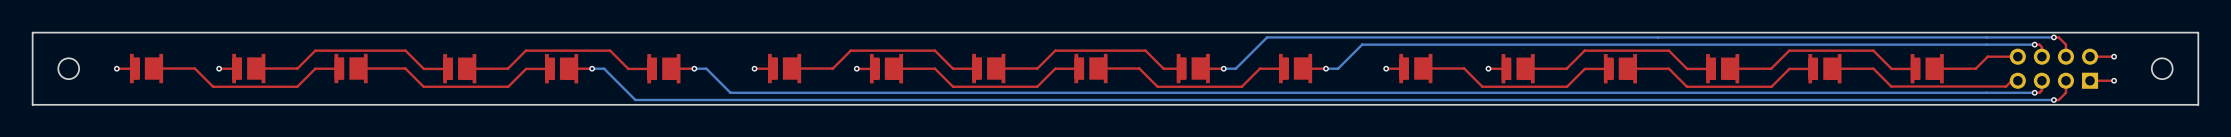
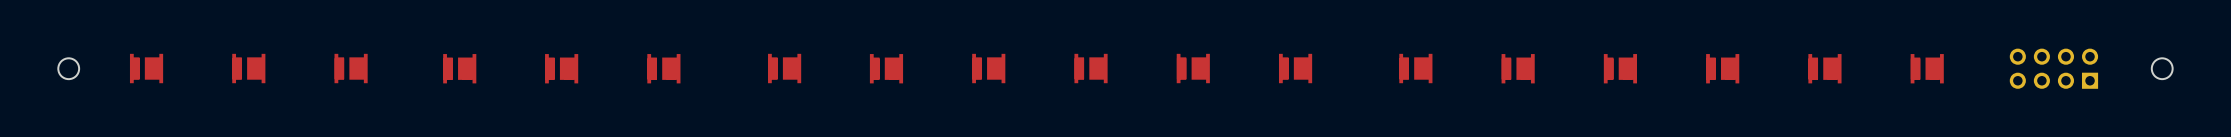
board edge: (2198, 32) (2198, 104) (32, 104) (32, 32) (2198, 32) -> none
top track: (2053, 37) (2058, 37) (2065, 44) (2065, 56) -> none
bottom track: (2053, 37) (1267, 37) (1235, 68) (1223, 68) -> none
via: (2053, 37) -> none
top track: (2034, 44) (2039, 44) (2041, 47) (2041, 56) -> none
bottom track: (2034, 44) (1362, 44) (1338, 68) (1326, 68) -> none
via: (2034, 44) -> none
top track: (2017, 56) (1987, 56) (1975, 68) (1934, 68) -> none
top track: (2114, 56) (2090, 56) -> none
via: (2114, 56) -> none
via: (116, 68) -> none
top track: (134, 68) (116, 68) -> none
top track: (153, 68) (194, 68) (213, 86) (297, 86) (315, 68) (339, 68) -> none
via: (219, 68) -> none
top track: (237, 68) (219, 68) -> none
top track: (256, 68) (297, 68) (315, 50) (405, 50) (423, 68) (448, 68) -> none
top track: (358, 68) (405, 68) (423, 86) (508, 86) (526, 68) (549, 68) -> none
top track: (466, 68) (507, 68) (525, 50) (610, 50) (628, 68) (652, 68) -> none
top track: (592, 68) (568, 68) -> none
bottom track: (592, 68) (604, 68) (635, 100) (2053, 100) -> none
via: (592, 68) -> none
top track: (694, 68) (671, 68) -> none
bottom track: (694, 68) (706, 68) (730, 92) (2034, 92) -> none
via: (694, 68) -> none
via: (754, 68) -> none
top track: (772, 68) (754, 68) -> none
top track: (791, 68) (832, 68) (850, 50) (934, 50) (953, 68) (977, 68) -> none
top track: (856, 68) (874, 68) -> none
via: (856, 68) -> none
top track: (995, 68) (1037, 68) (1055, 50) (1145, 50) (1163, 68) (1181, 68) -> none
top track: (1079, 68) (1055, 68) (1037, 86) (953, 86) (934, 68) (893, 68) -> none
top track: (1098, 68) (1139, 68) (1157, 86) (1241, 86) (1259, 68) (1283, 68) -> none
top track: (1200, 68) (1223, 68) -> none
via: (1223, 68) -> none
top track: (1302, 68) (1326, 68) -> none
via: (1326, 68) -> none
via: (1386, 68) -> none
top track: (1404, 68) (1386, 68) -> none
top track: (1423, 68) (1464, 68) (1482, 86) (1567, 86) (1584, 68) (1608, 68) -> none
via: (1488, 68) -> none
top track: (1506, 68) (1488, 68) -> none
top track: (1525, 68) (1566, 68) (1584, 50) (1668, 50) (1687, 68) (1711, 68) -> none
top track: (1627, 68) (1668, 68) (1686, 86) (1771, 86) (1789, 68) (1813, 68) -> none
top track: (1729, 68) (1771, 68) (1789, 50) (1873, 50) (1891, 68) (1915, 68) -> none
top track: (1832, 68) (1873, 68) (1891, 86) (2006, 86) (2011, 80) (2017, 80) -> none
top track: (2041, 80) (2041, 90) (2039, 92) (2034, 92) -> none
top track: (2065, 80) (2065, 92) (2058, 100) (2053, 100) -> none
top track: (2114, 80) (2090, 80) -> none
via: (2114, 80) -> none
via: (2034, 92) -> none
via: (2053, 100) -> none

